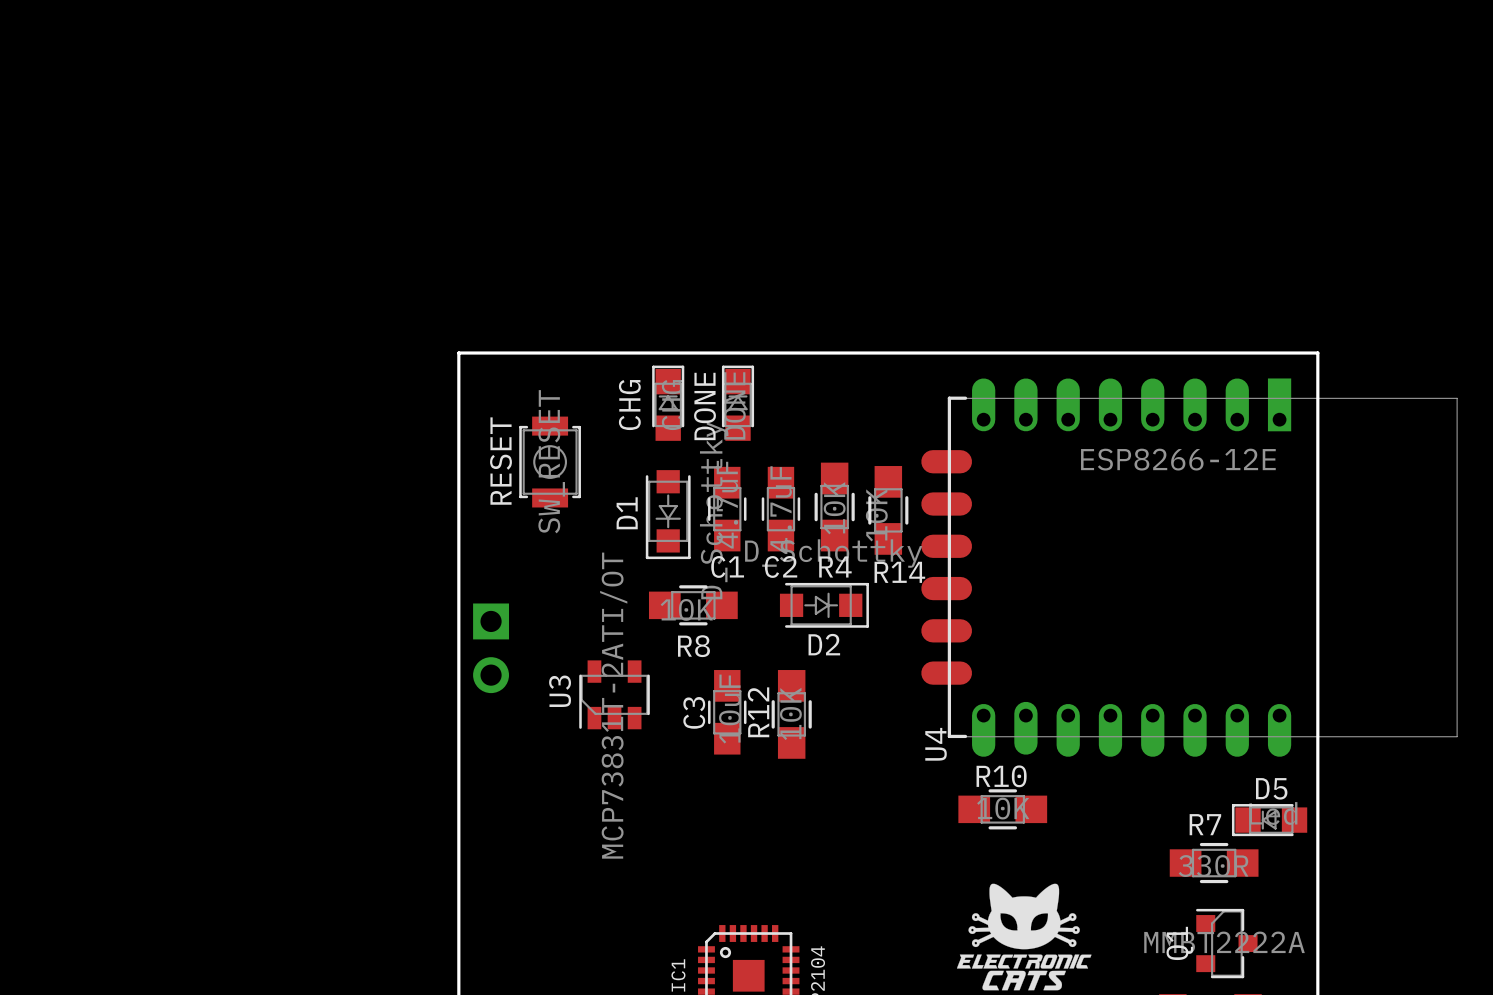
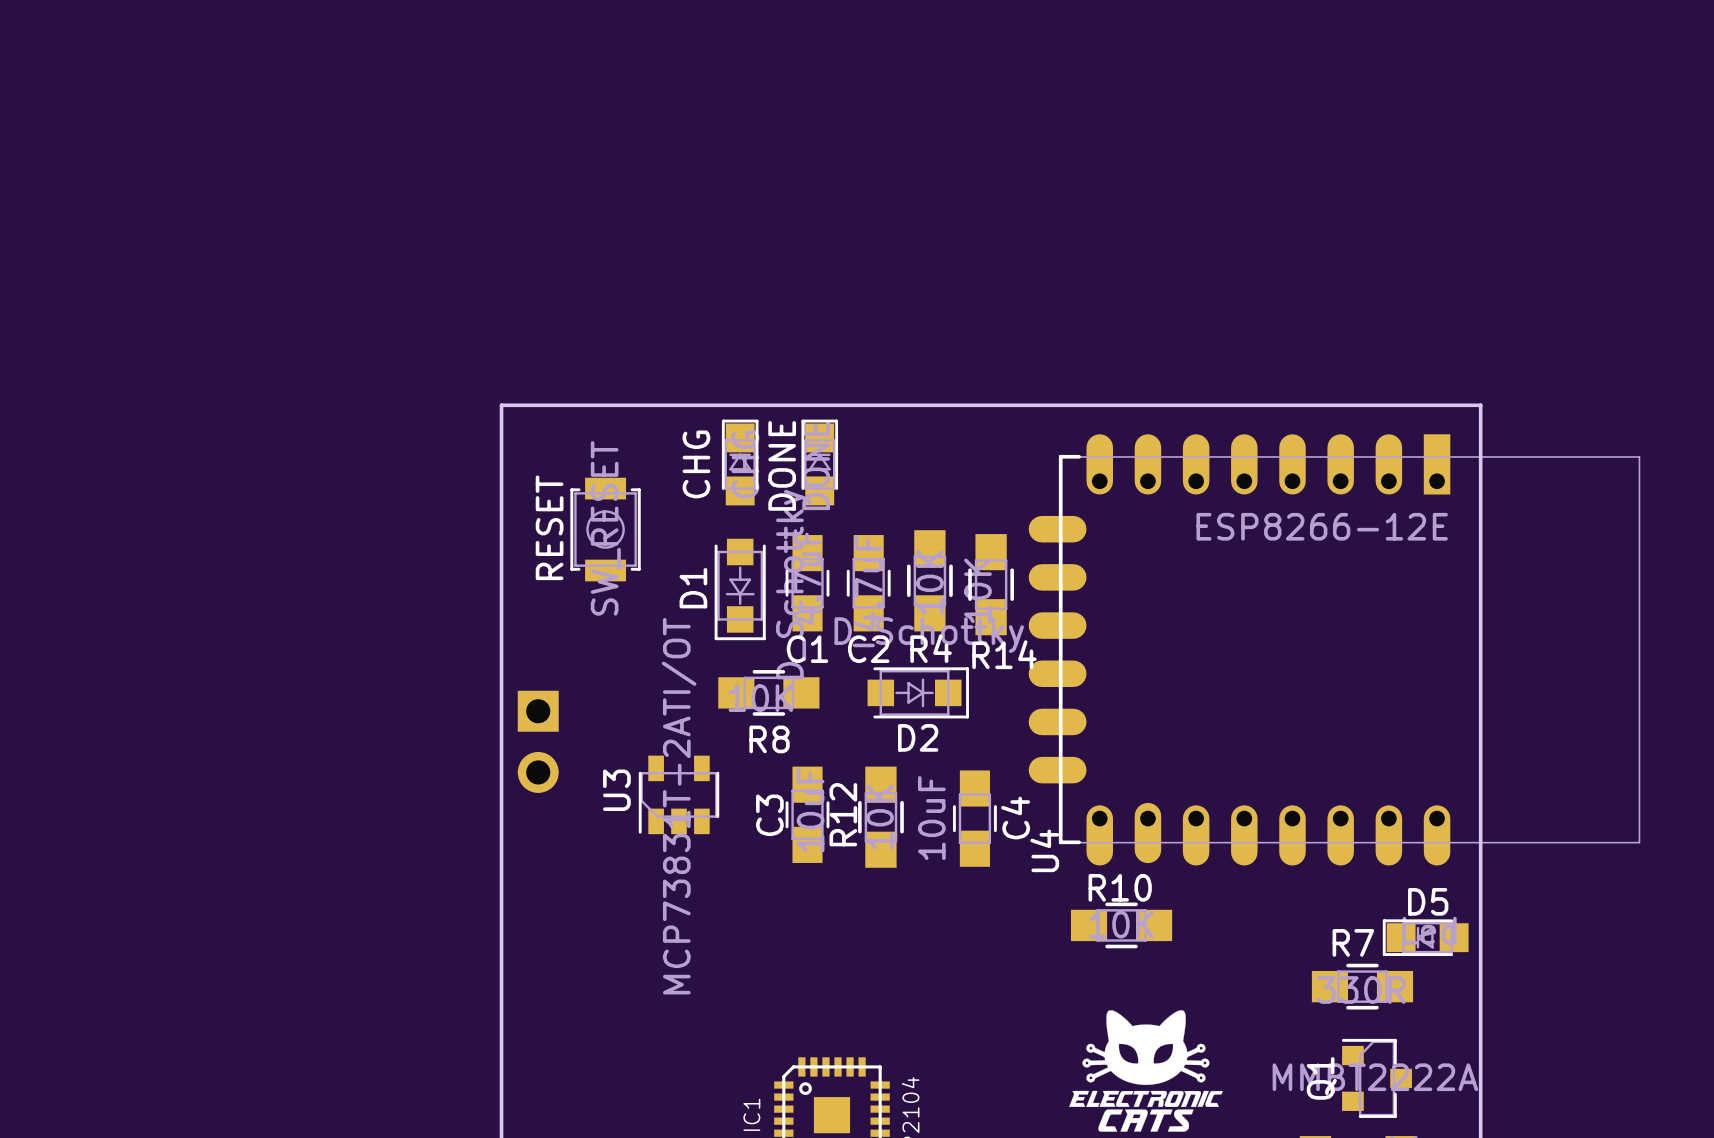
C4: none -> 10uF (974, 818)

